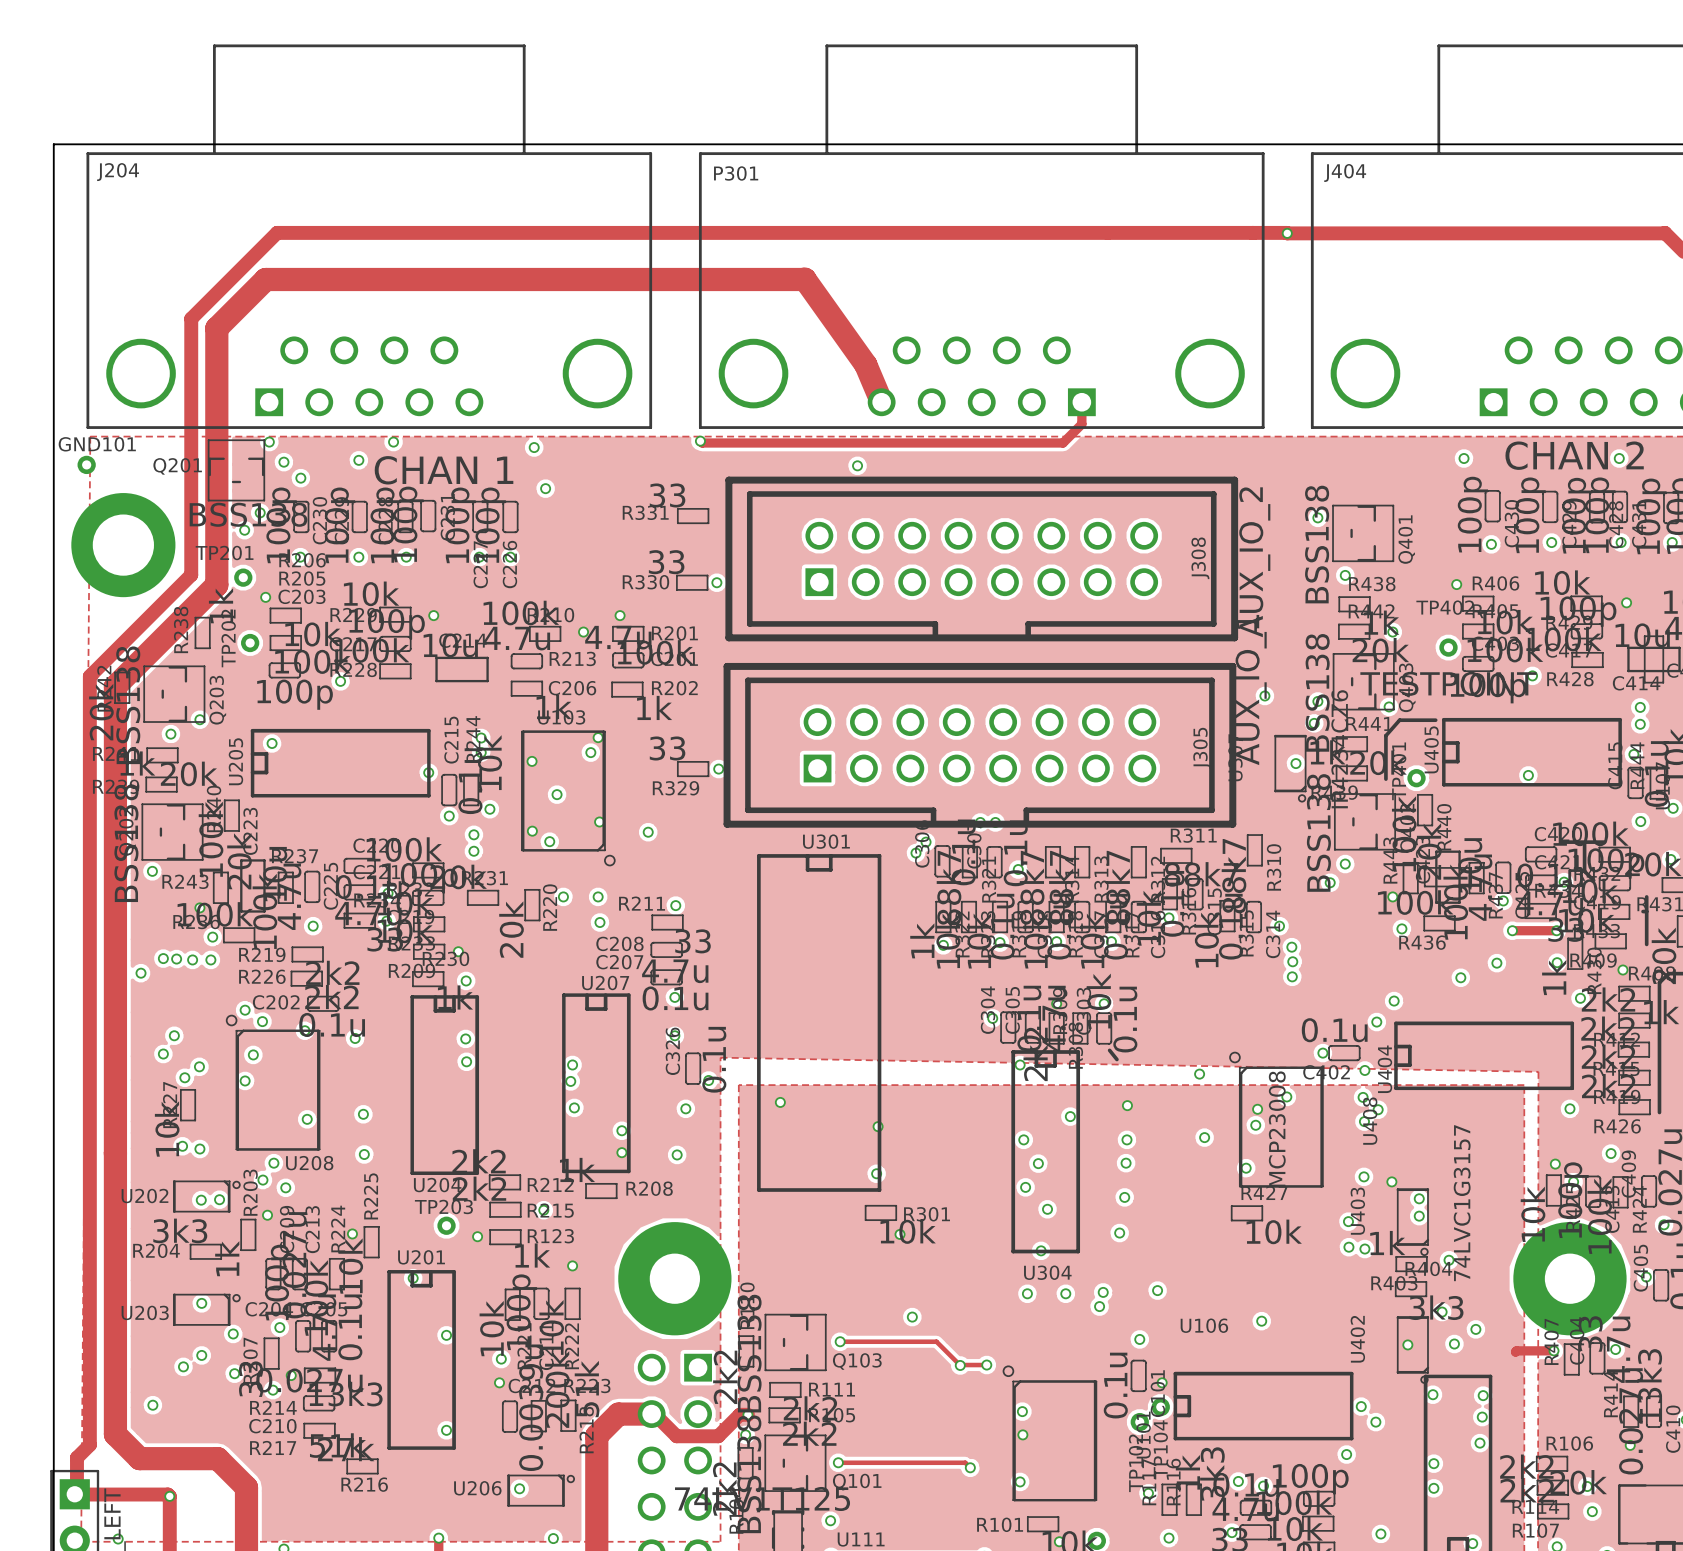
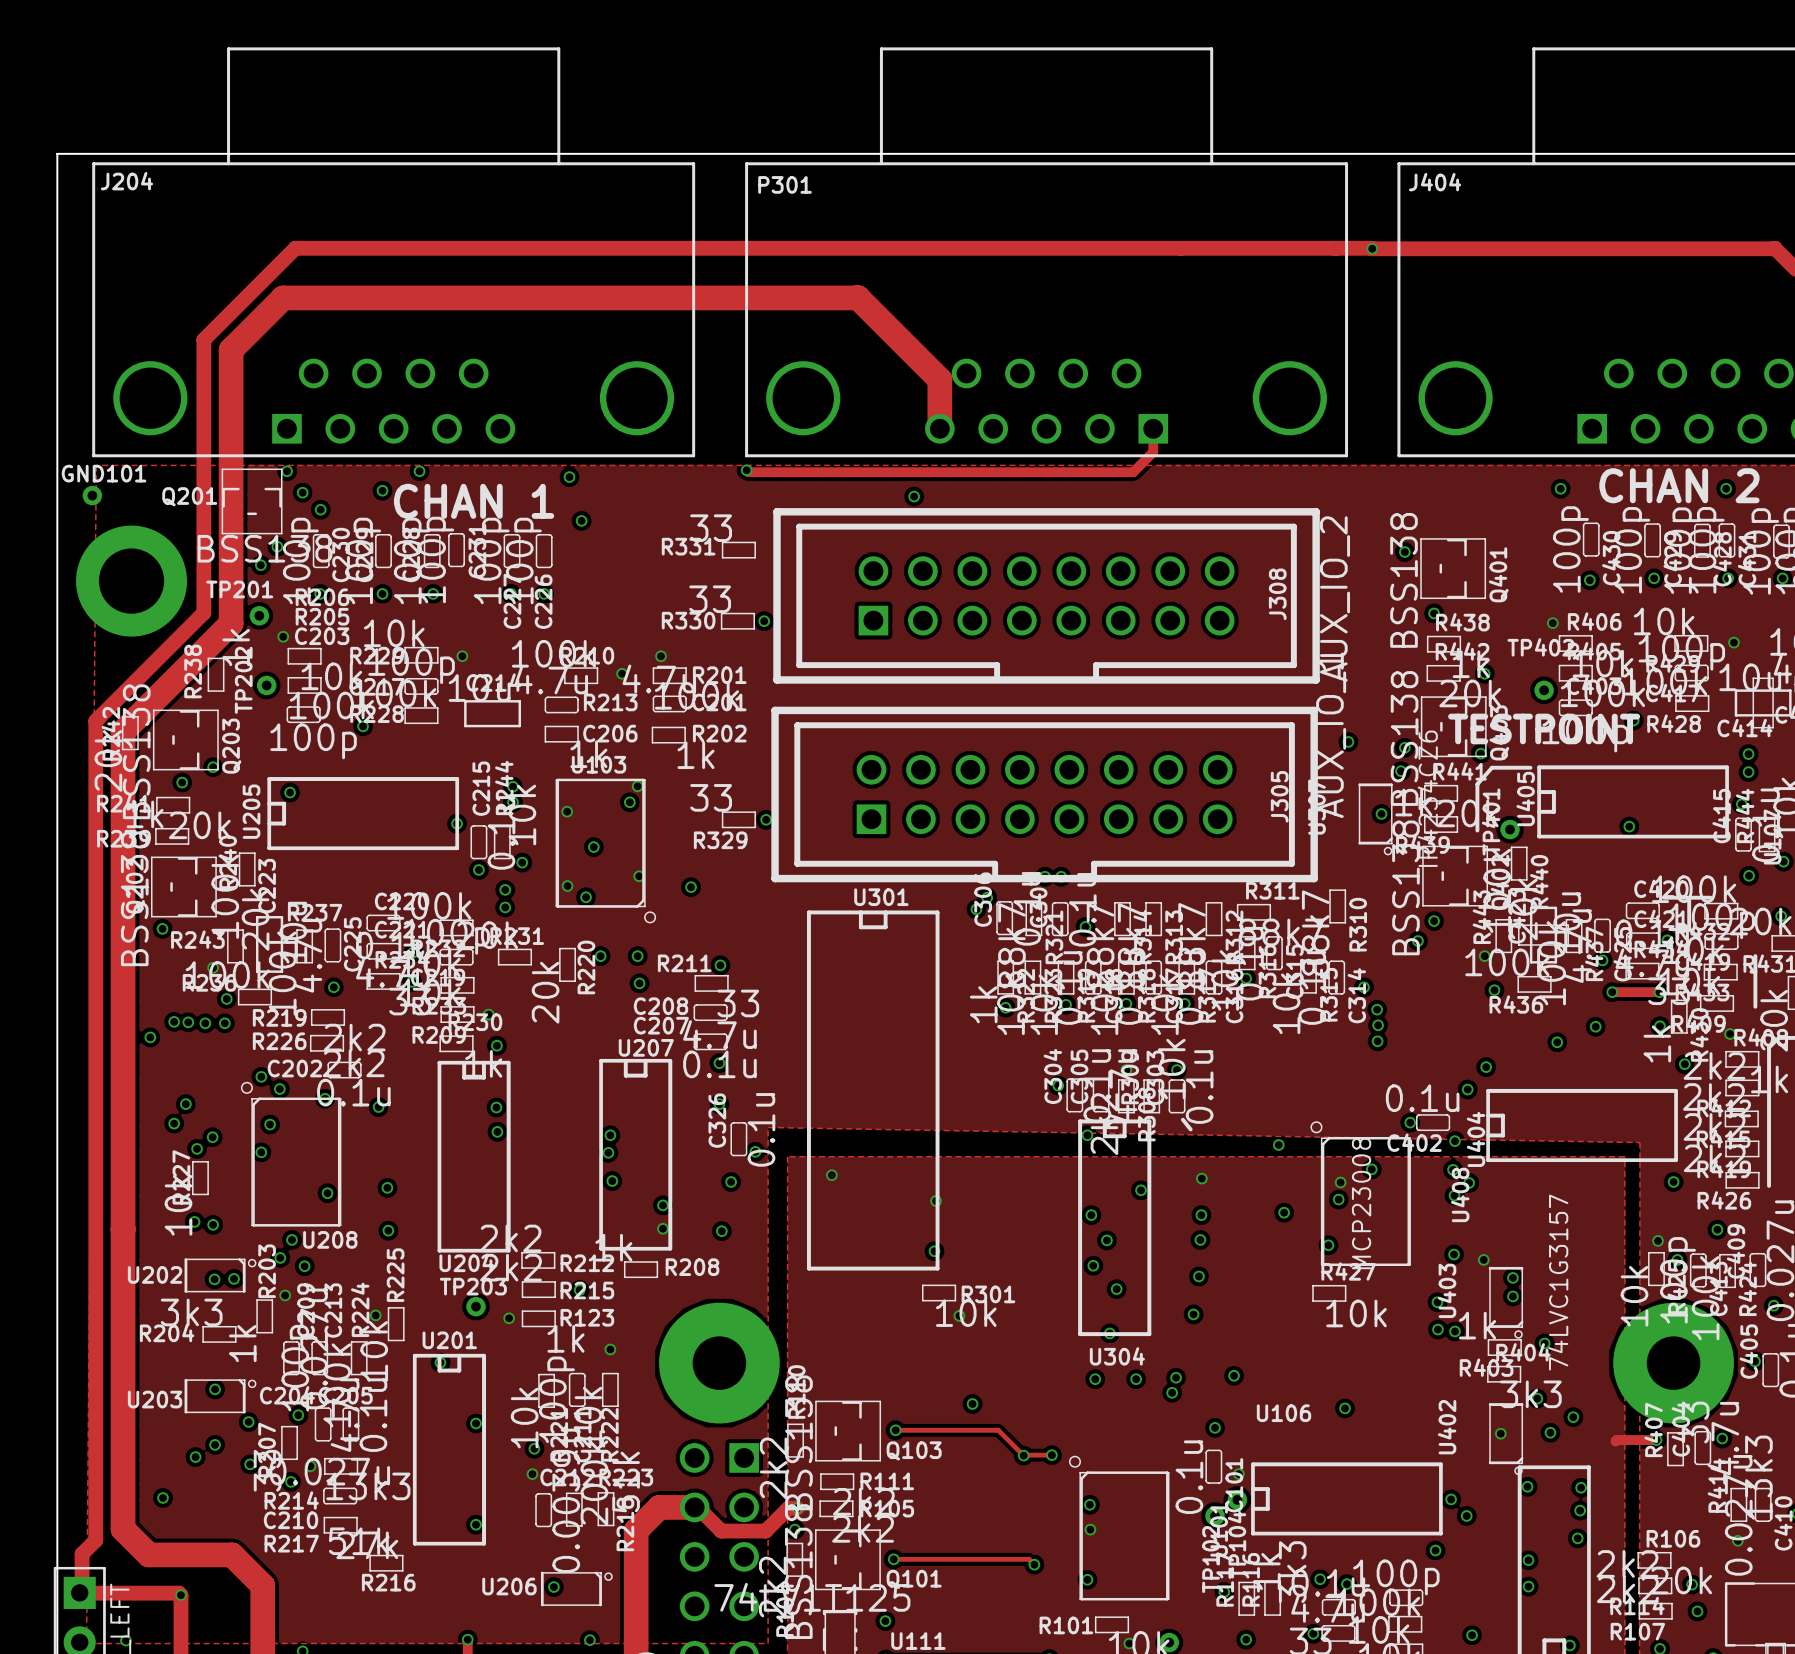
track: (805, 279) (865, 364) (881, 402) -> (858, 297) (939, 379) (939, 428)

